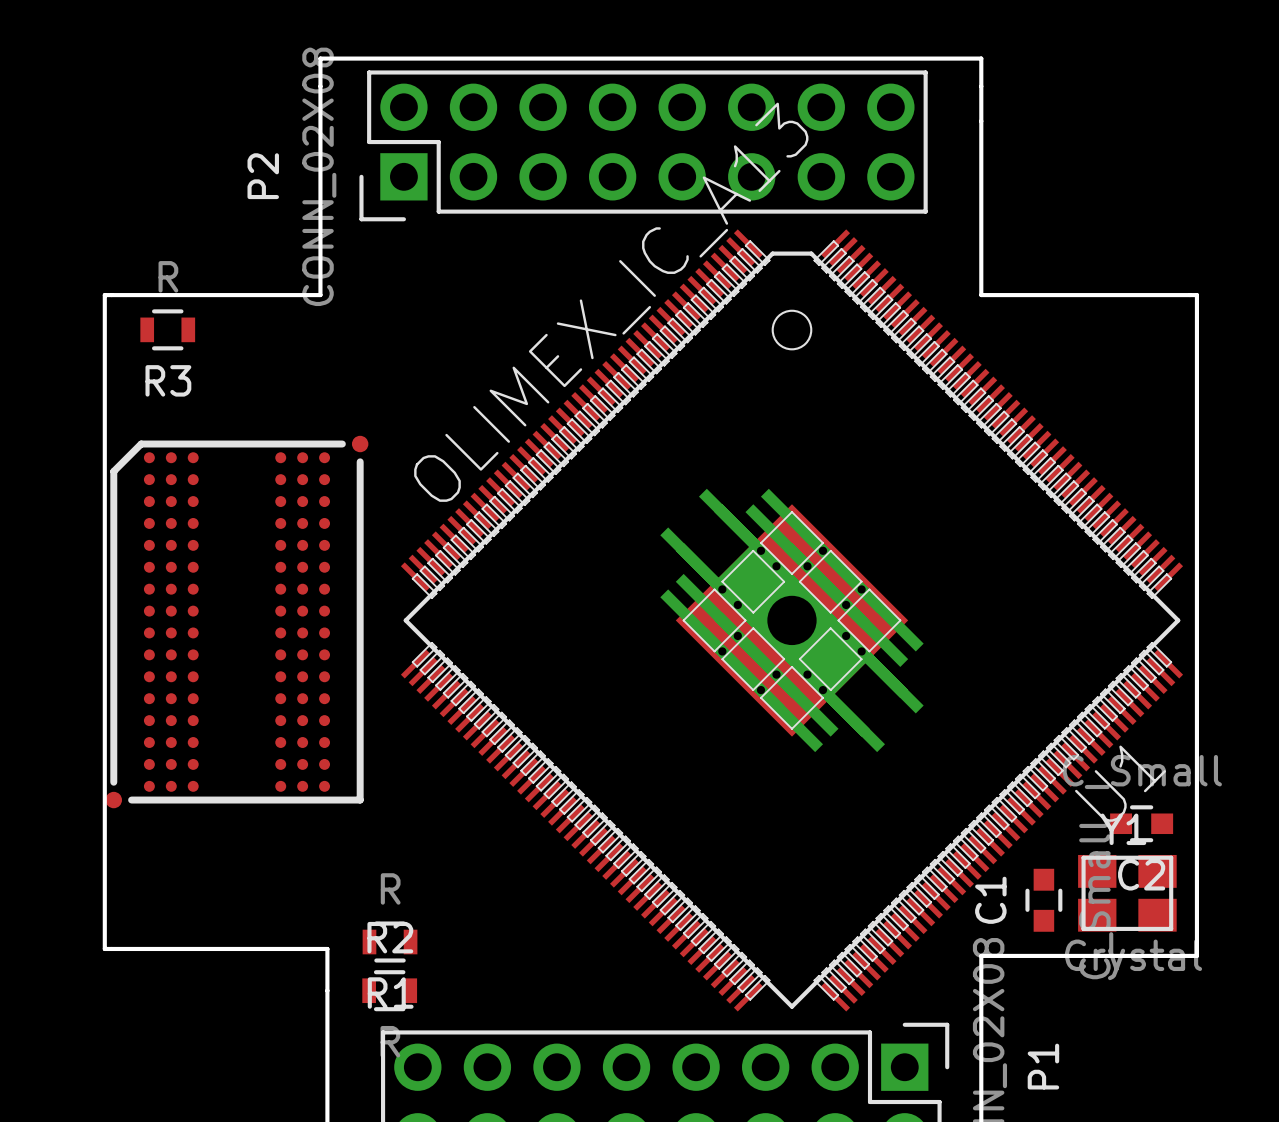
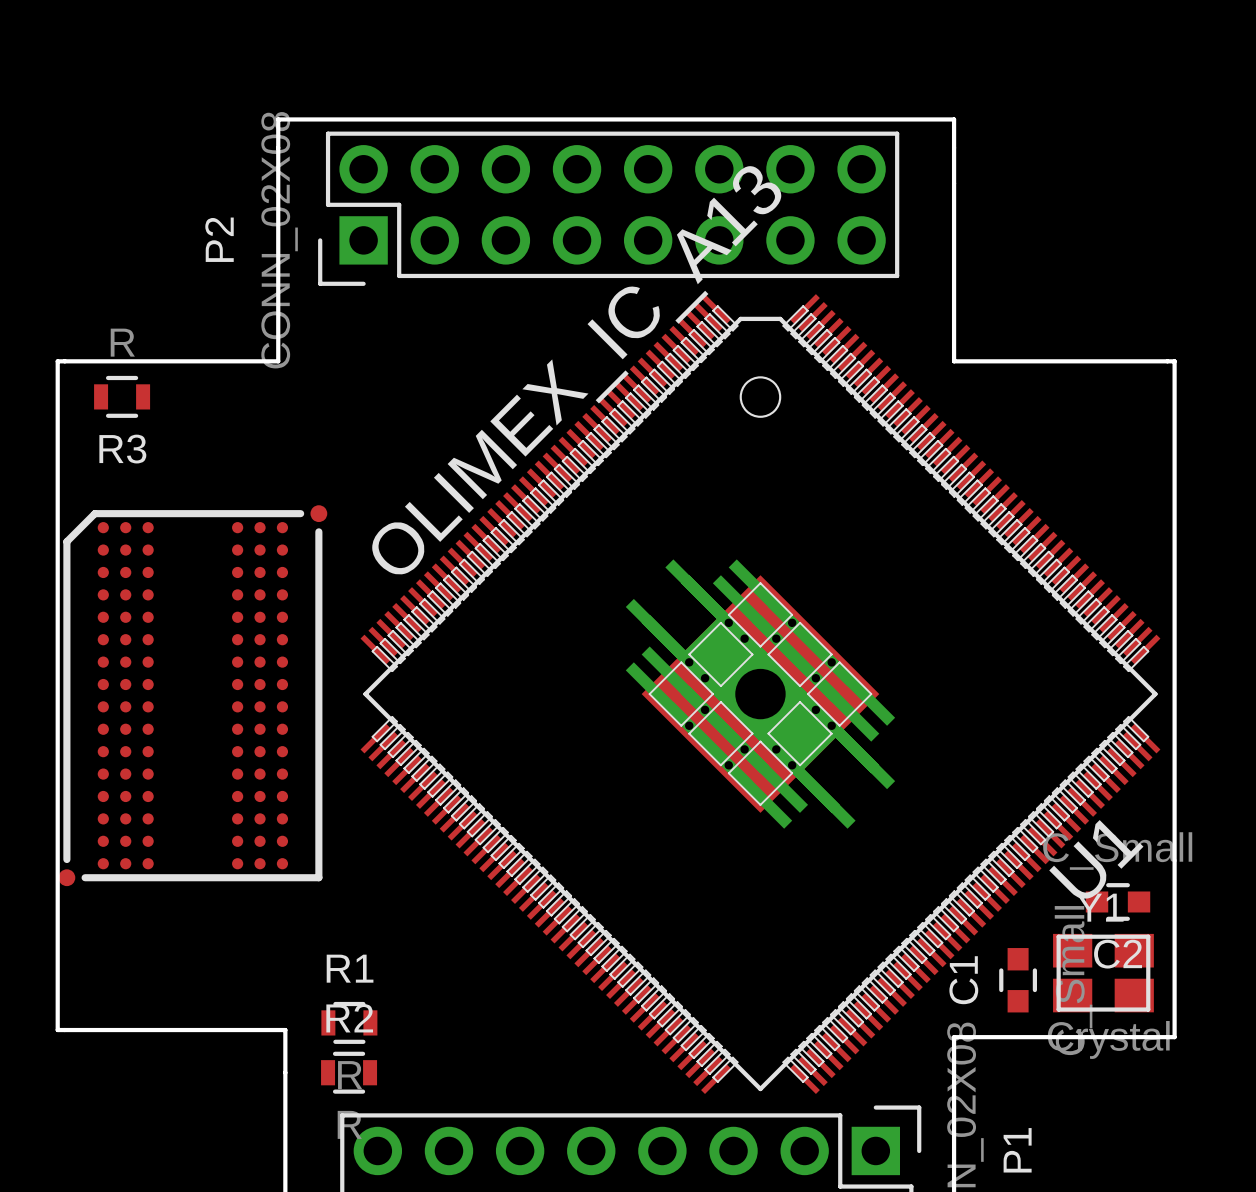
R1 value position: R (390, 888) -> R (350, 1075)
R1 name position: R1 (390, 993) -> R1 (350, 968)

